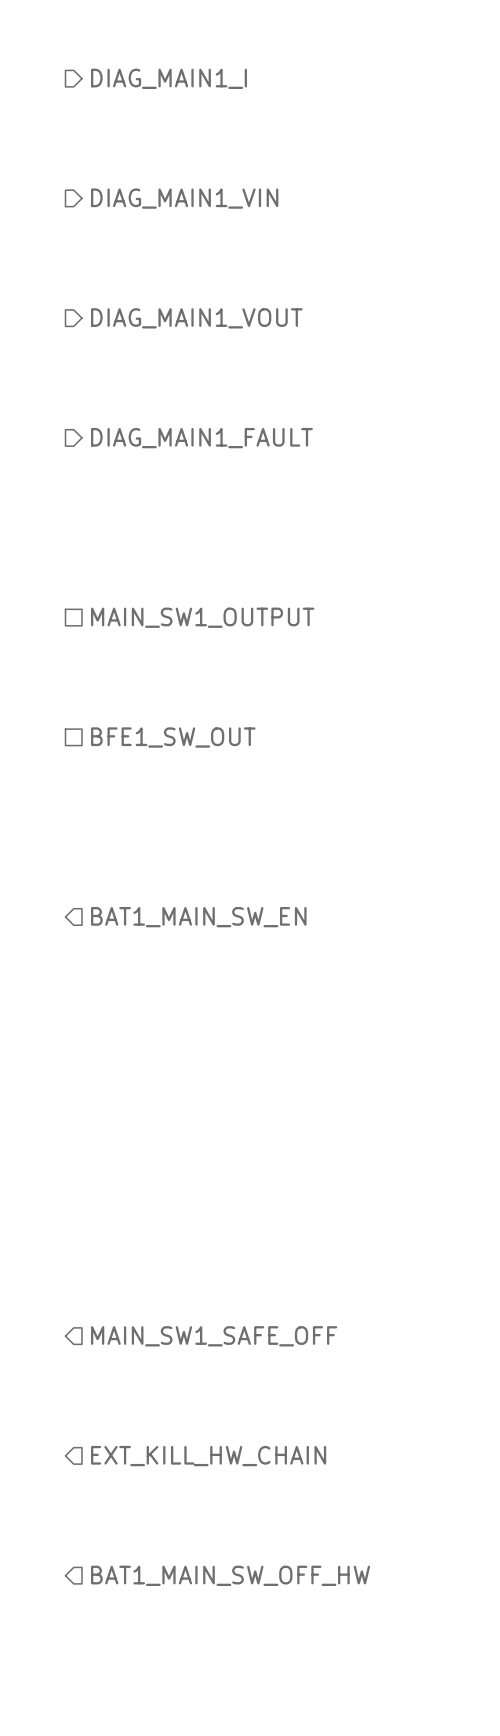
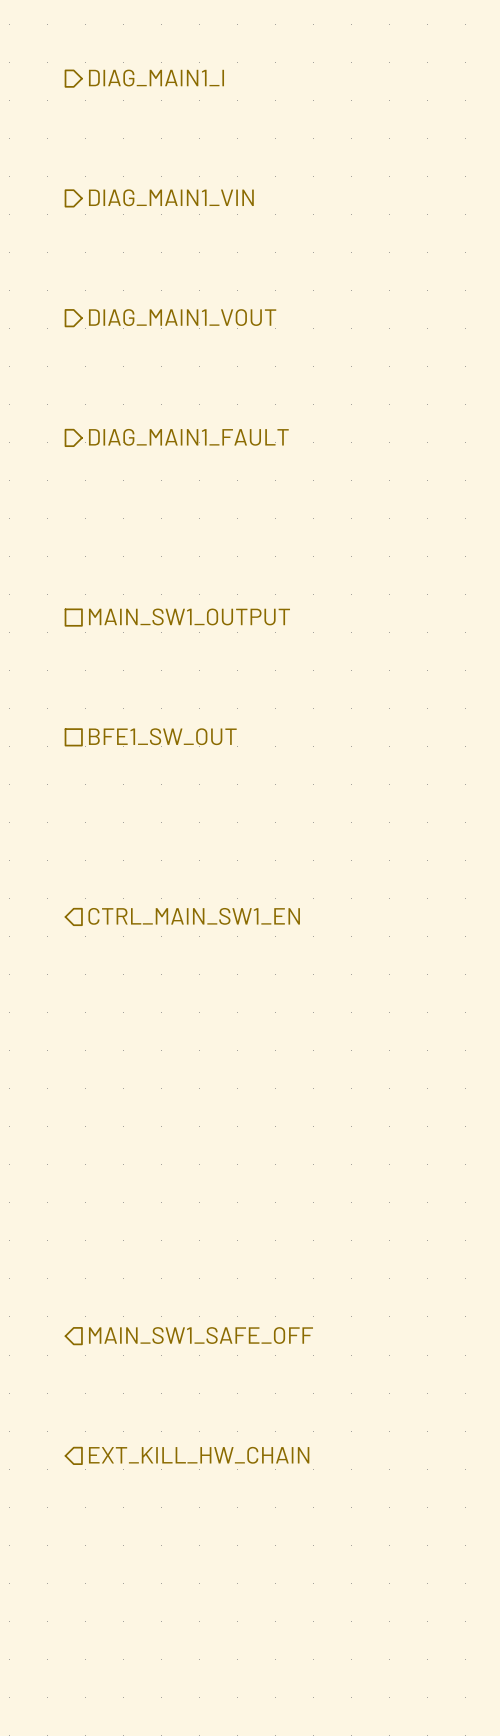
hierarchical label: BAT1_MAIN_SW_EN (198, 917) -> CTRL_MAIN_SW1_EN (194, 916)
hierarchical label: BAT1_MAIN_SW_OFF_HW (230, 1575) -> none

